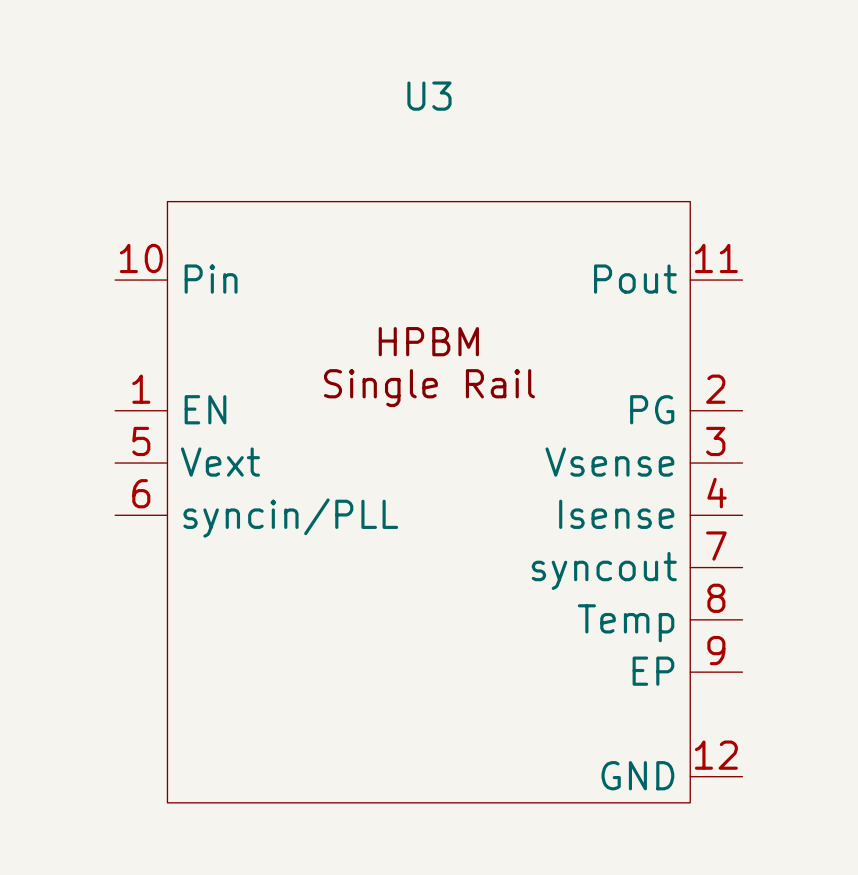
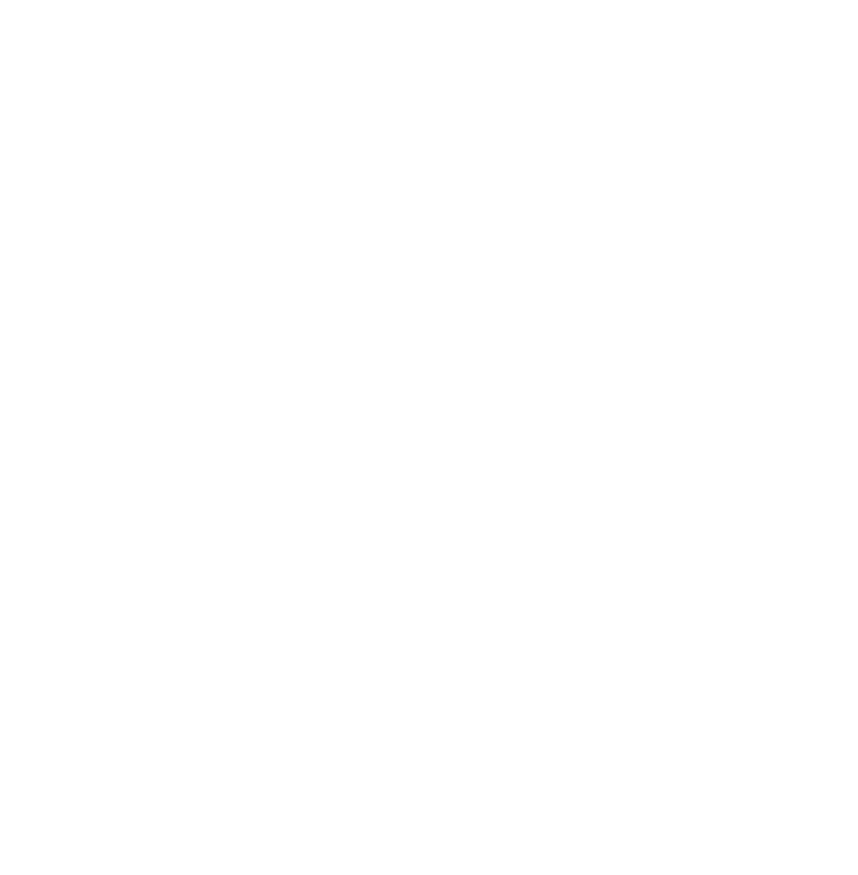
U3: (428, 502) -> none

